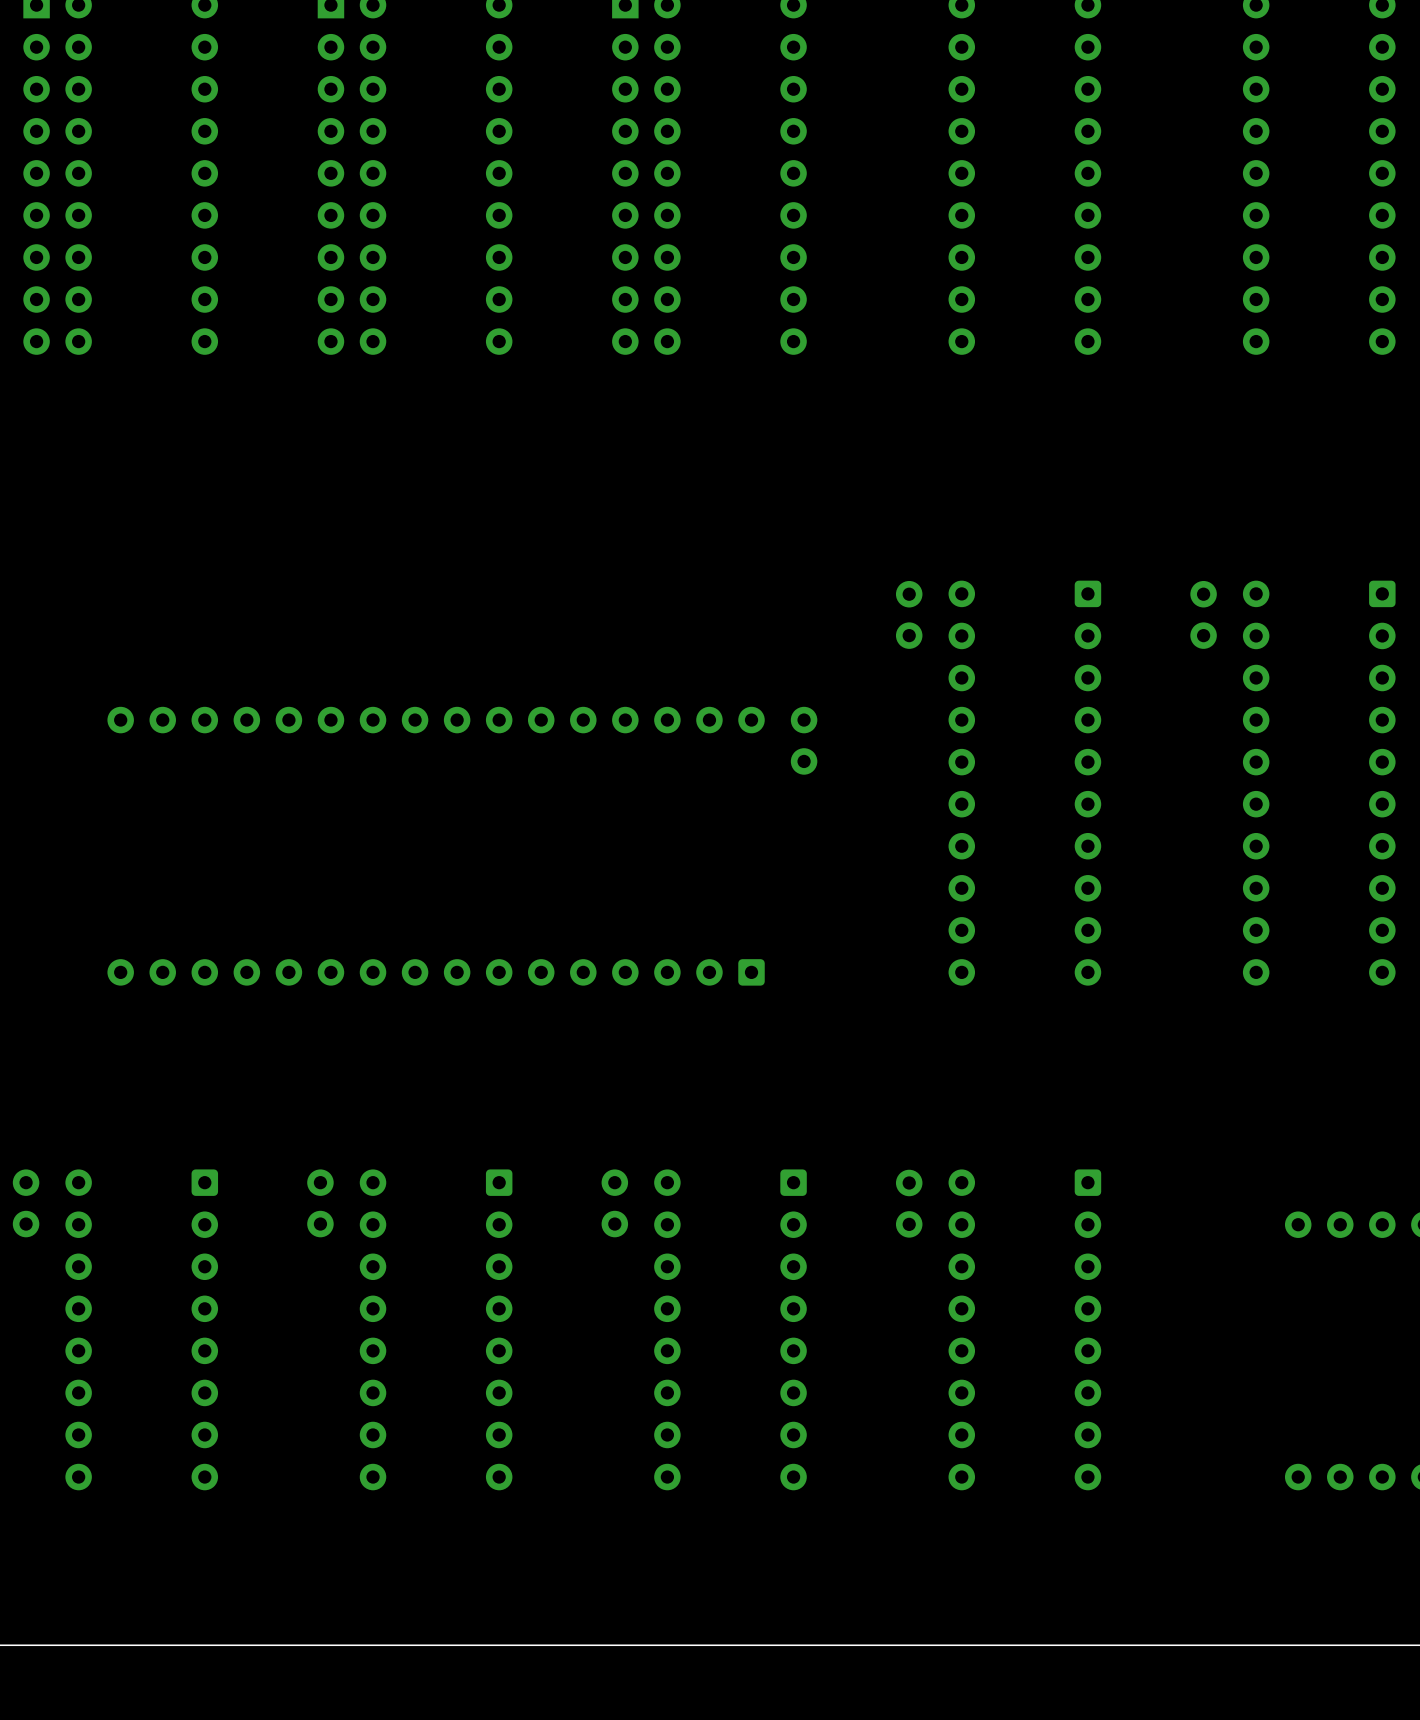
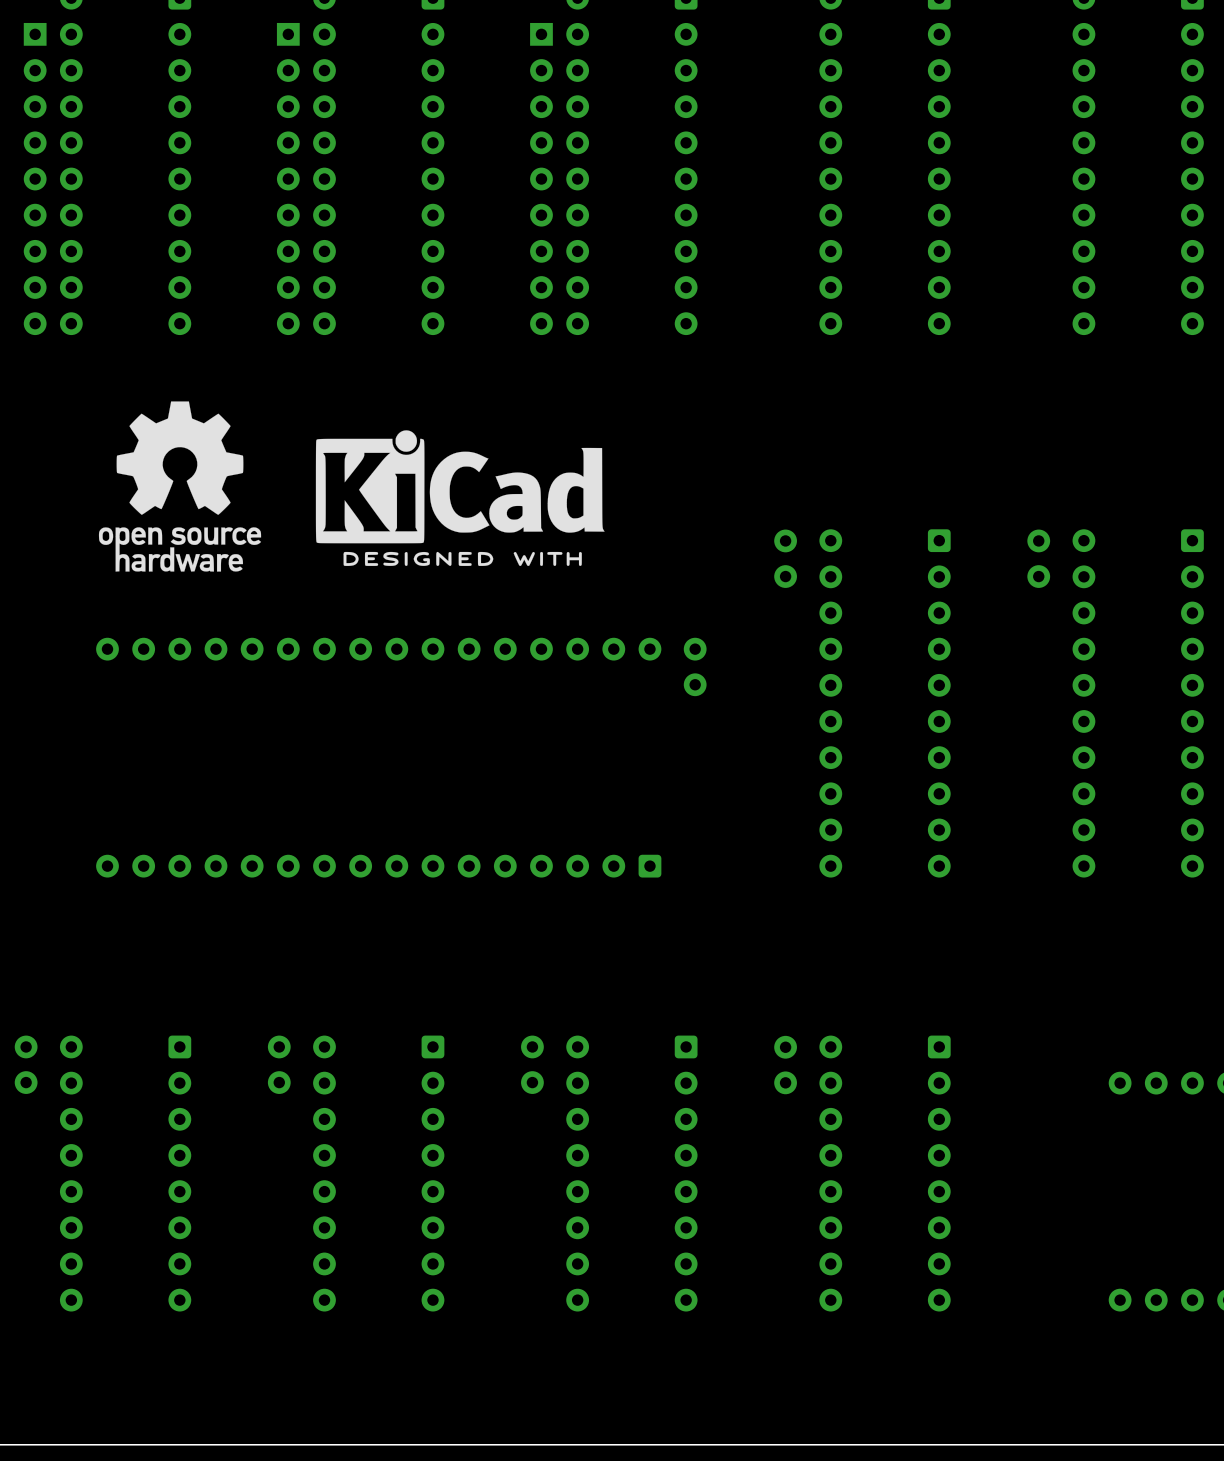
drawing: none -> [98, 401, 262, 572]
drawing: none -> [315, 430, 605, 566]

